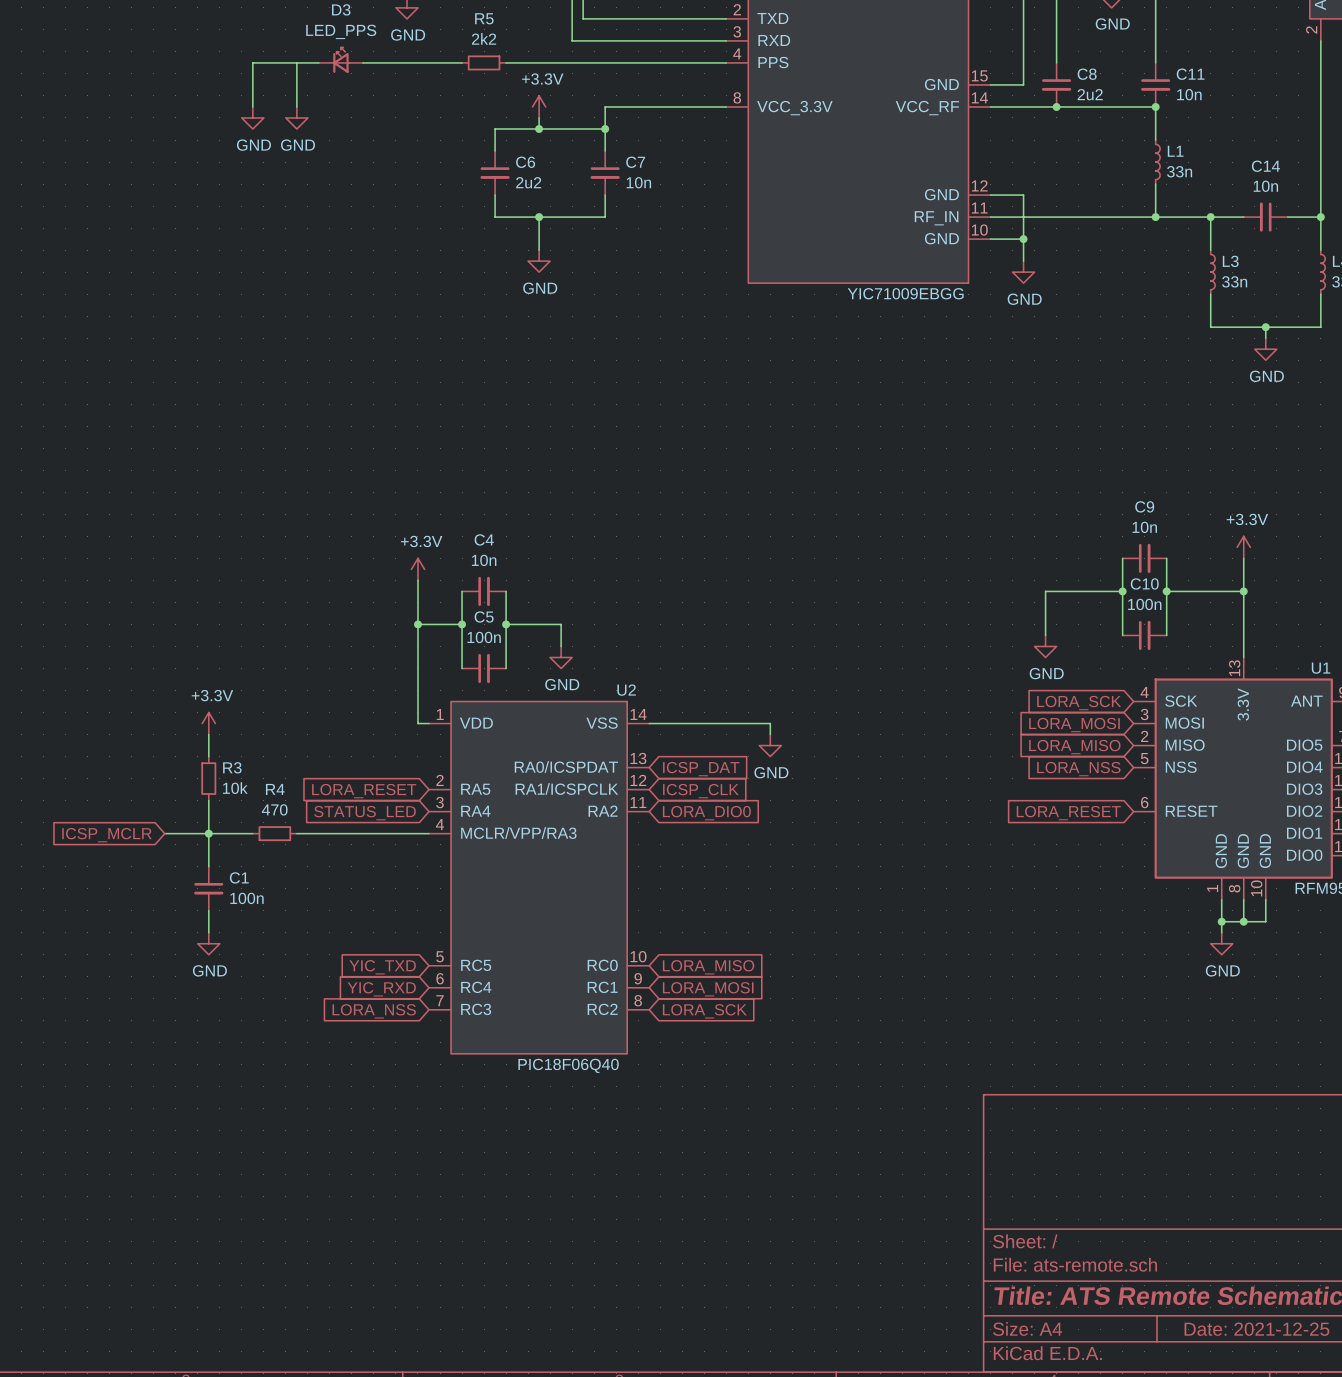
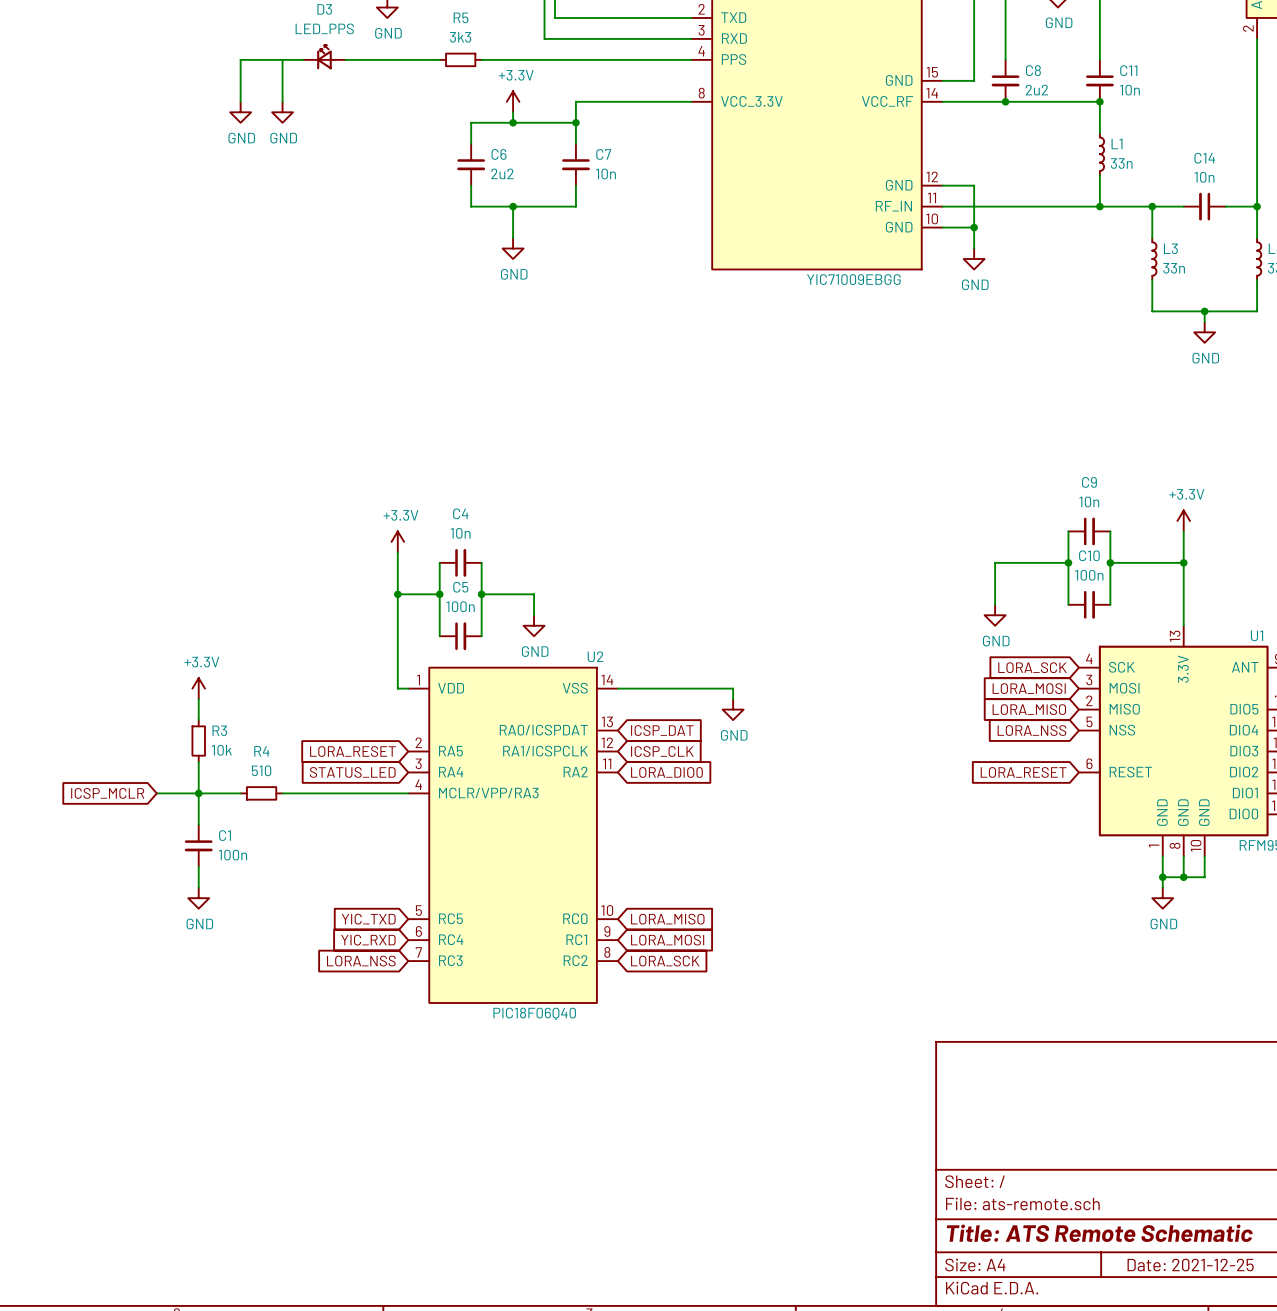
R5 value: 2k2 (484, 38) -> 3k3 (460, 37)
R4 value: 470 (274, 809) -> 510 (261, 770)

